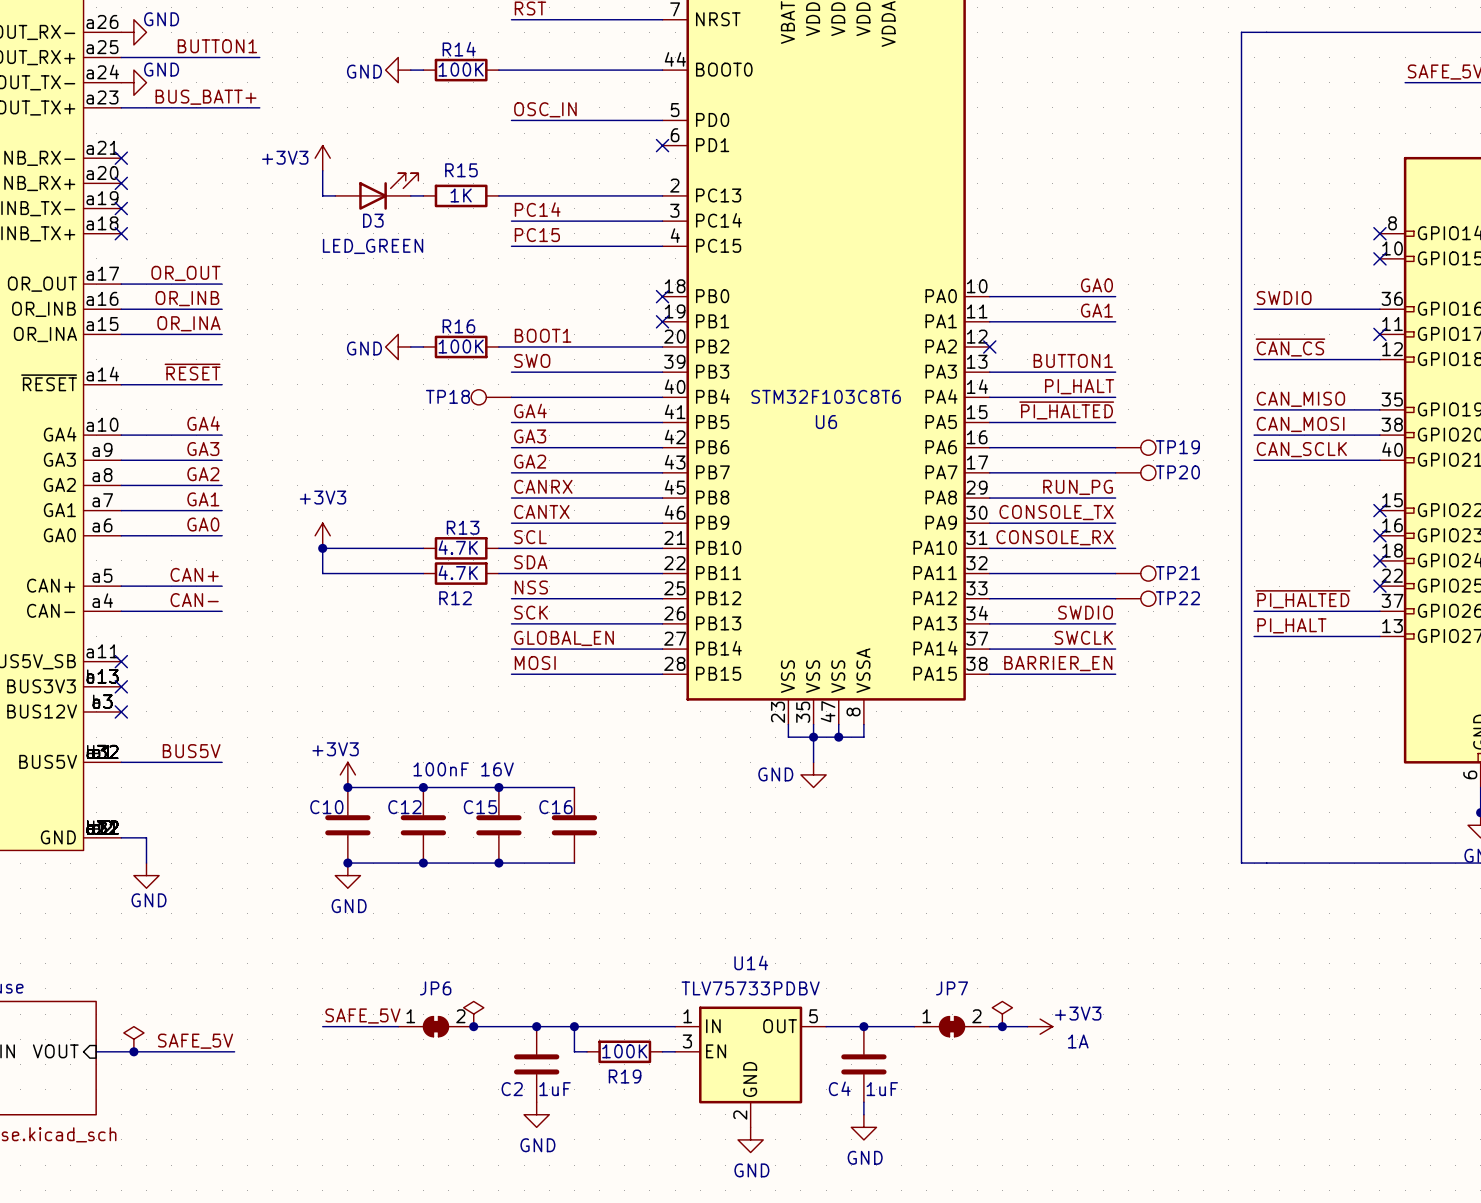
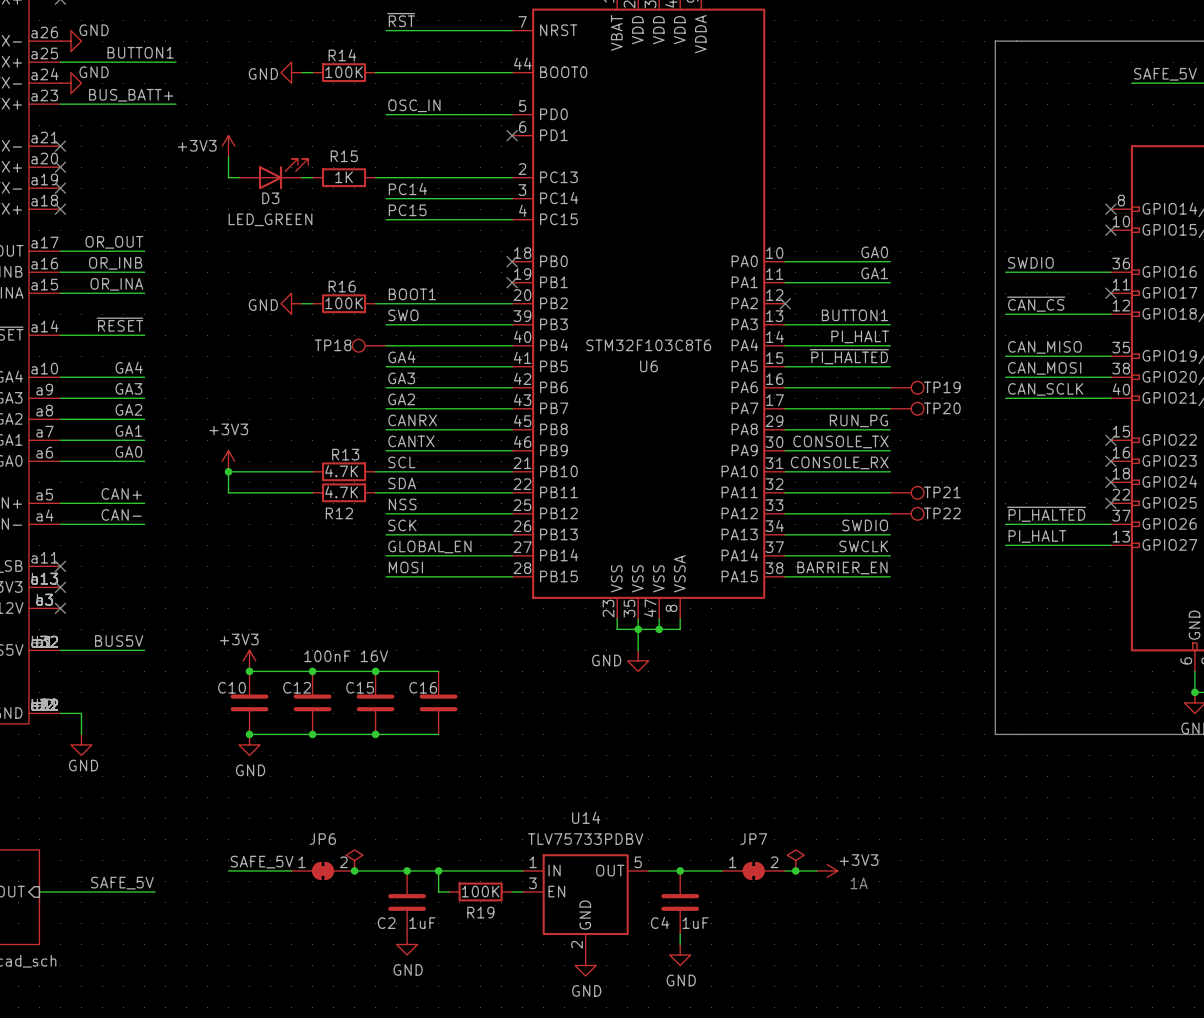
power symbol: (133, 1039) -> none
junction: (133, 1051) -> none

